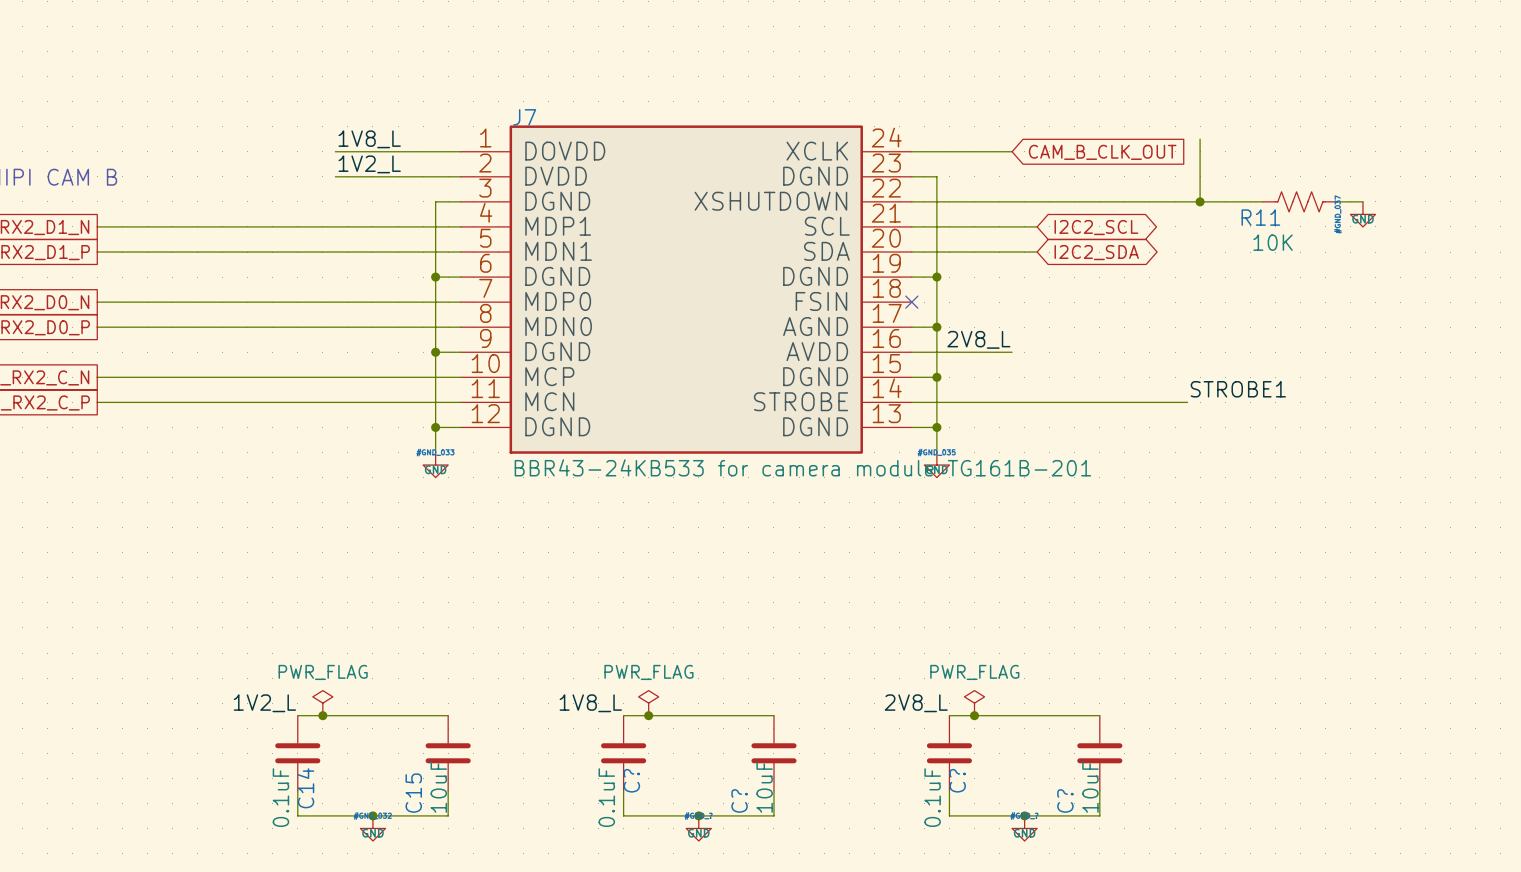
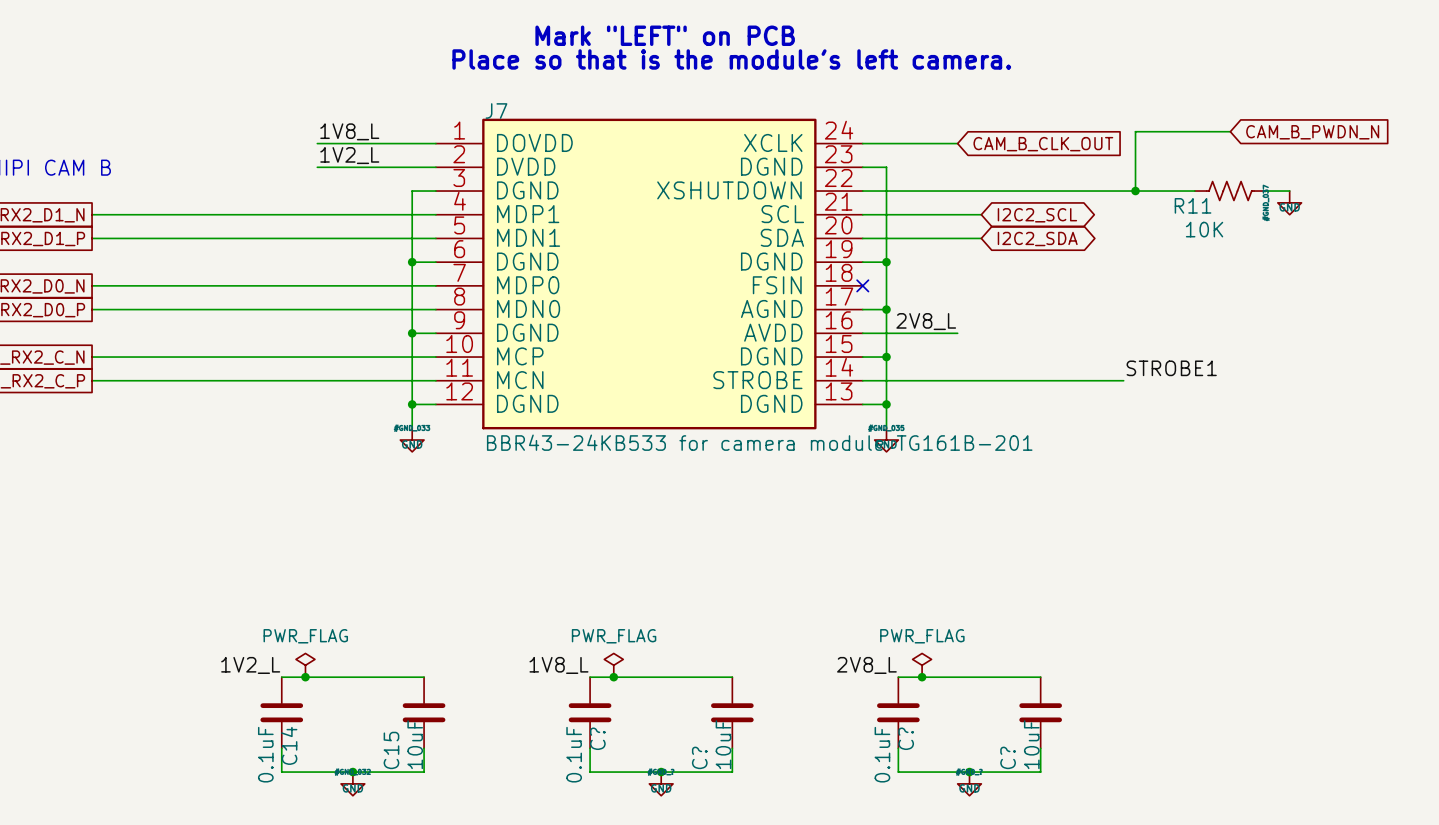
text: none -> Mark "LEFT" on PCB (665, 35)
text: none -> Place so that is the module's left camera. (731, 59)
wire: none -> (1135, 131) (1230, 131)
global label: none -> CAM_B_PWDN_N (1312, 132)

